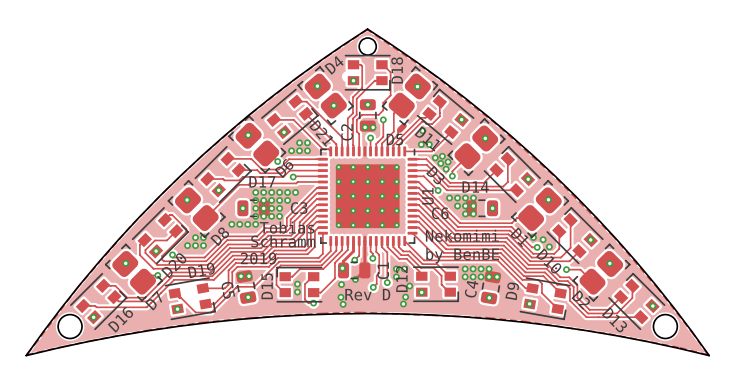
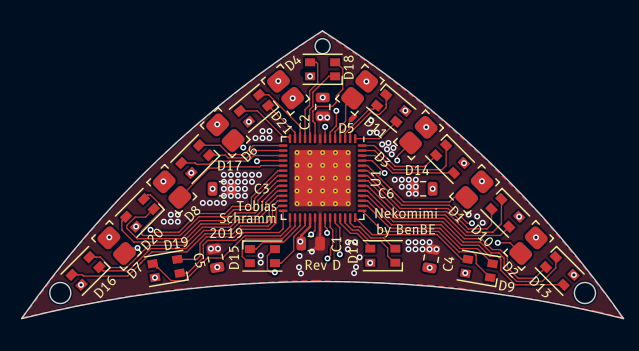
C4 name position: C4 (471, 289) -> C4 (448, 263)
D9 name rotation: 0° (512, 291) -> 90° clockwise (506, 286)
D9 name position: D9 (512, 291) -> D9 (506, 286)

